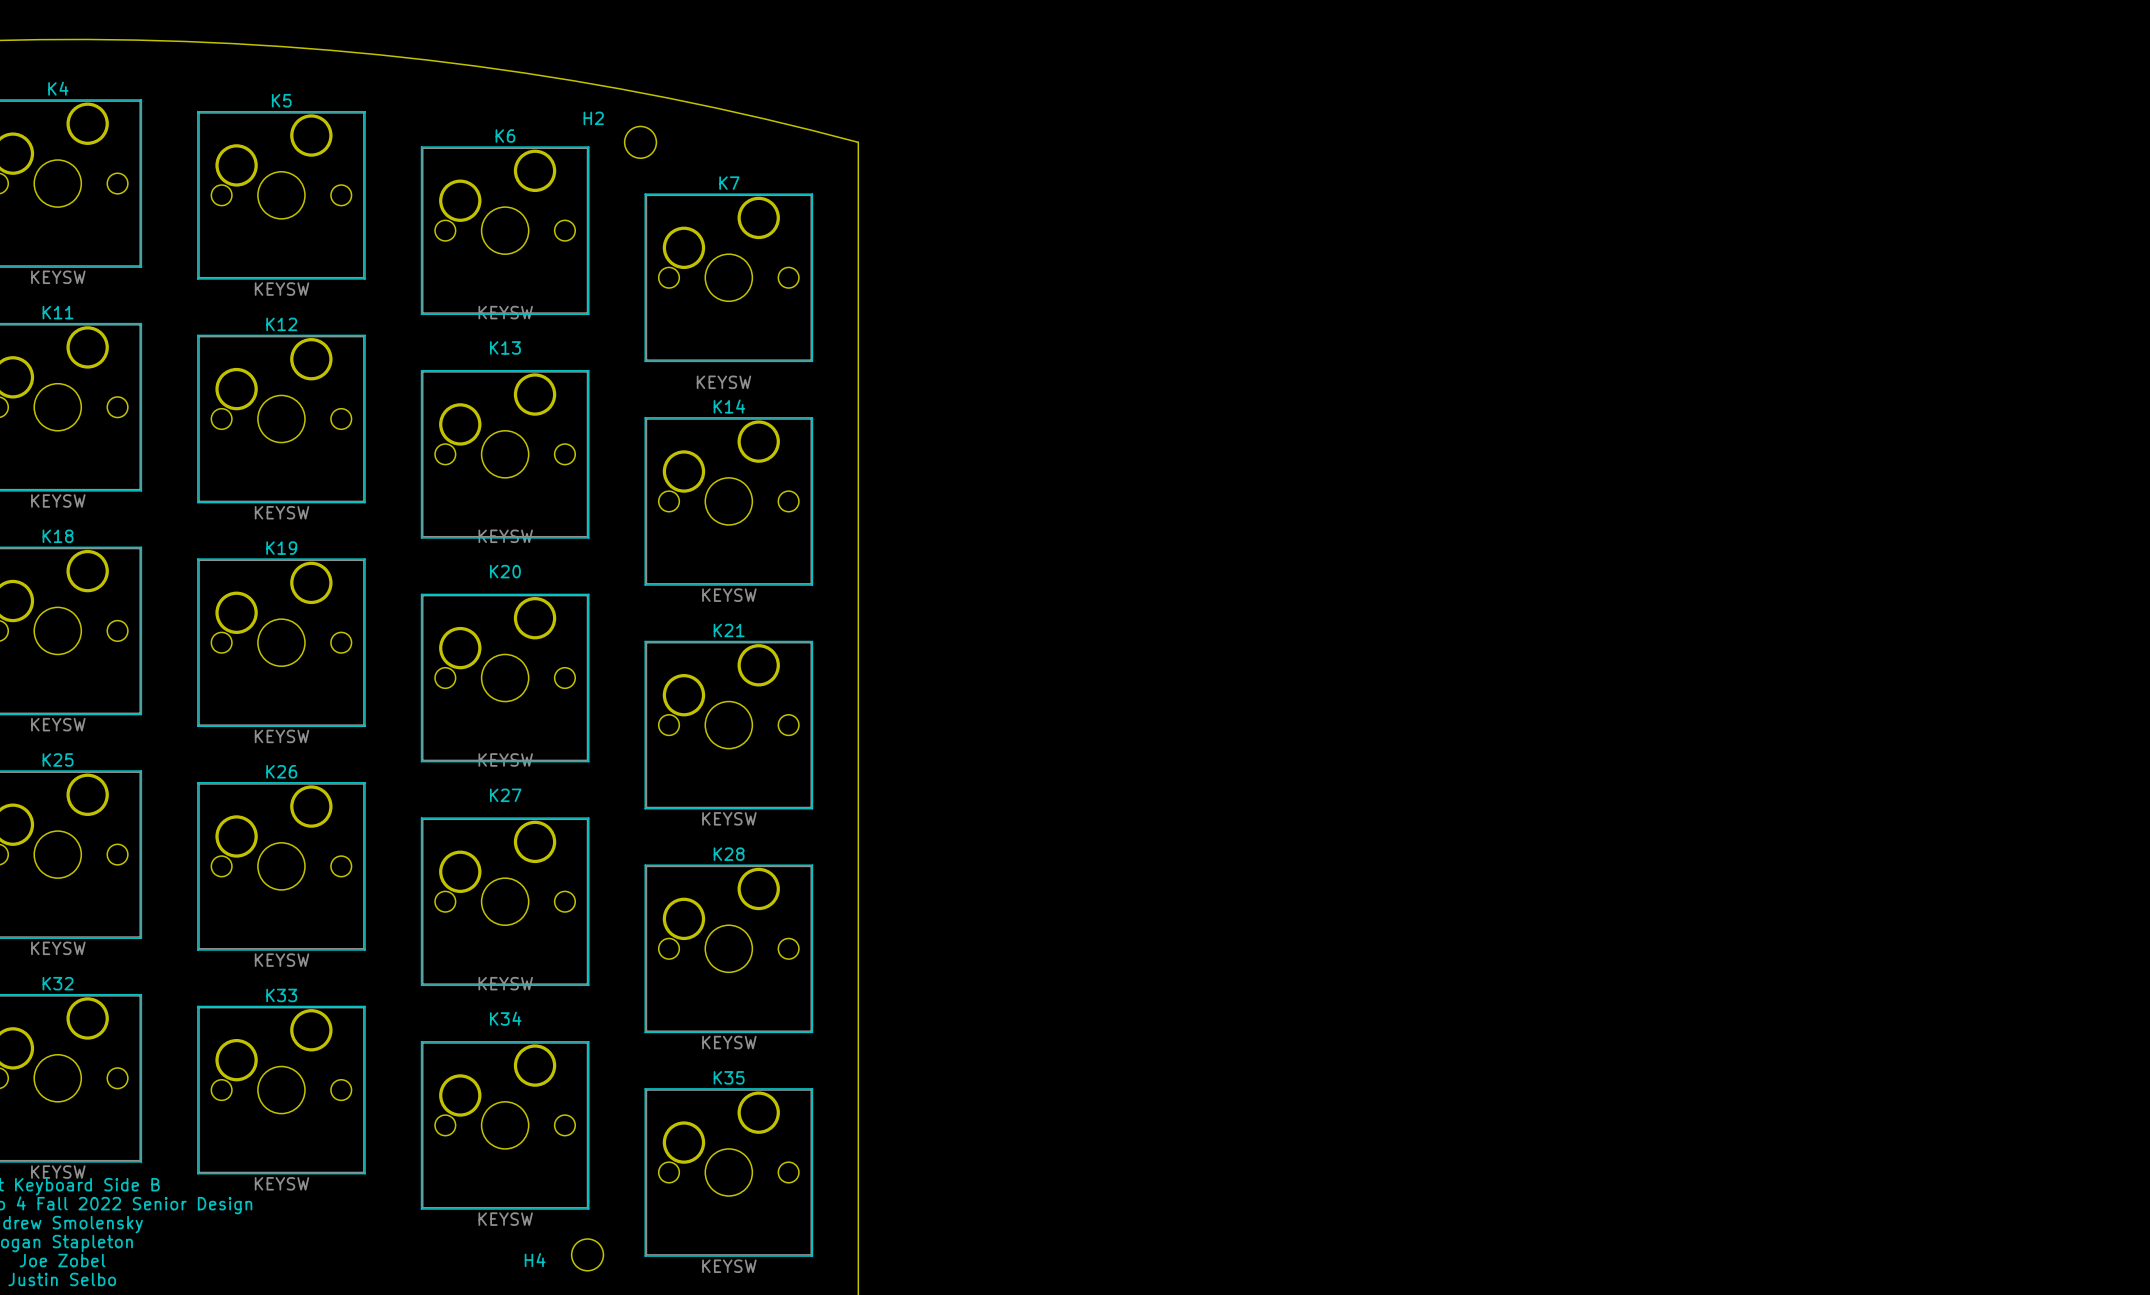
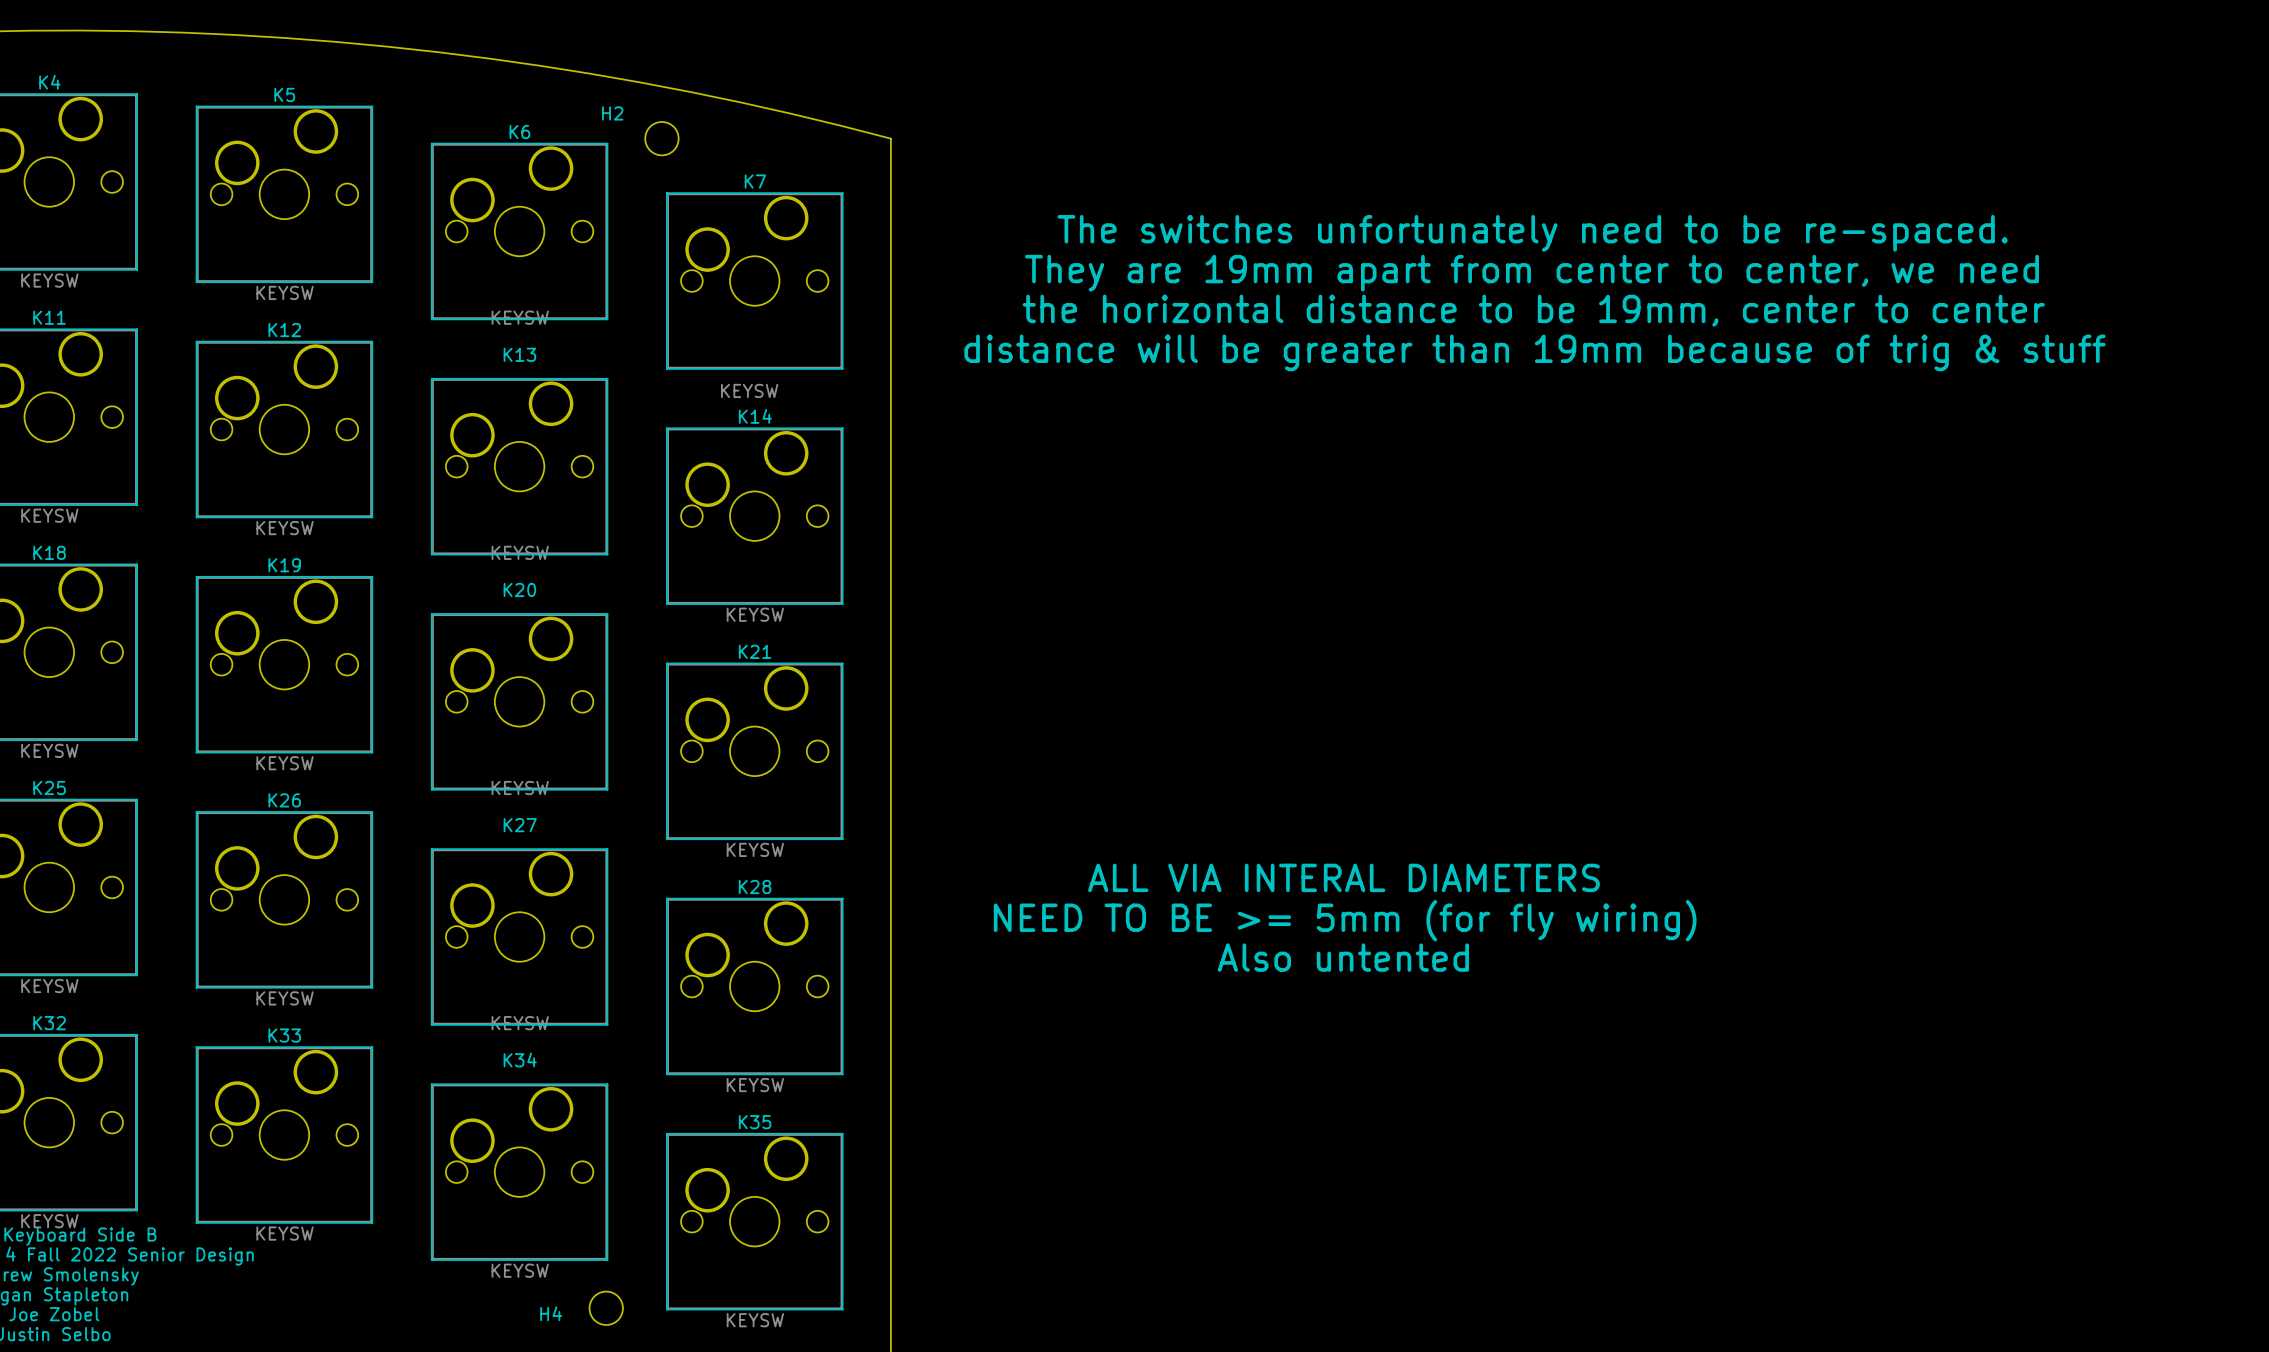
text: none -> The switches unfortunately need to be re-spaced. (1532, 233)
text: none -> They are 19mm apart from center to center, we need (1532, 273)
text: none -> the horizontal distance to be 19mm, center to center (1533, 310)
text: none -> distance will be greater than 19mm because of trig & stuff (1534, 352)
text: none -> ALL VIA INTERAL DIAMETERS (1343, 877)
text: none -> NEED TO BE >= 5mm (for fly wiring) (1345, 920)
text: none -> Also untented (1343, 957)

